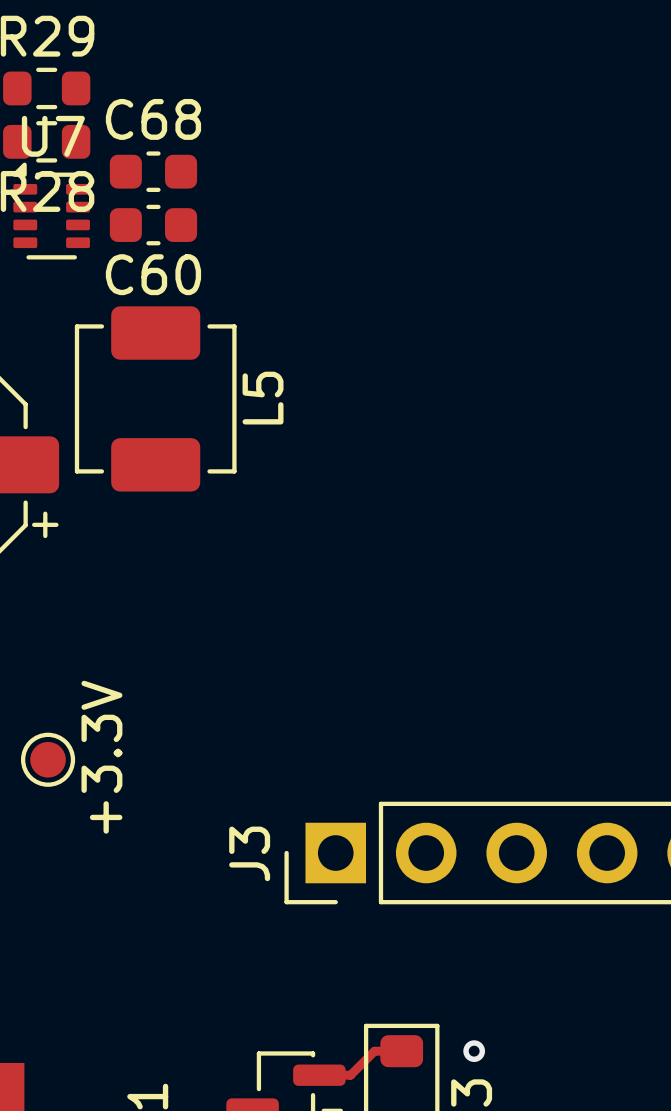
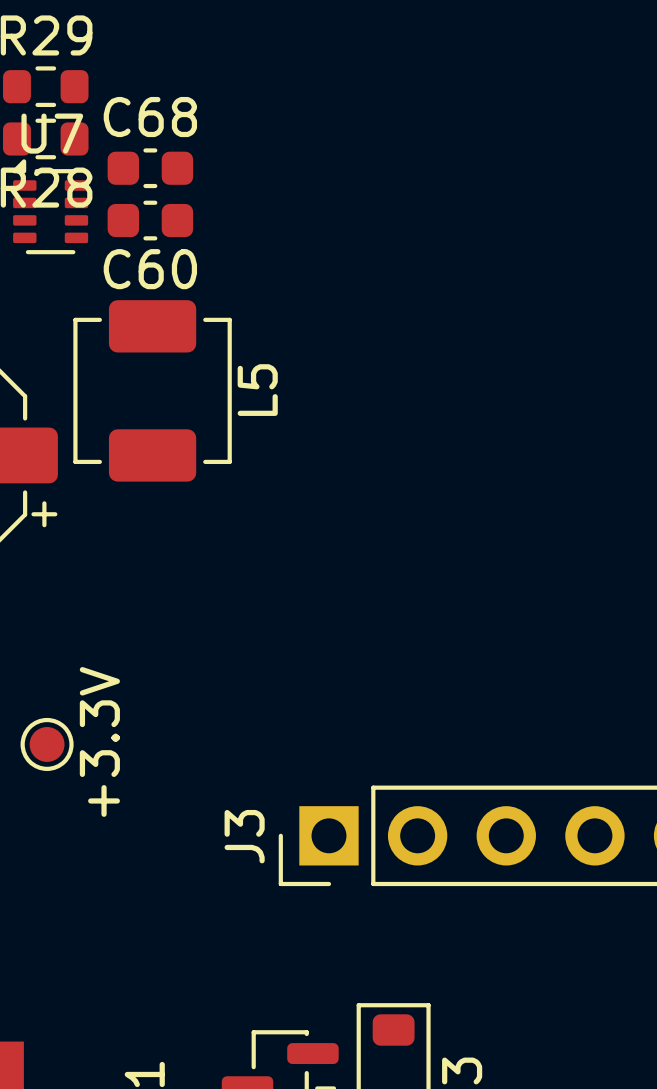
track: (401, 1051) (374, 1051) (350, 1075) (319, 1075) -> none
via: (474, 1051) -> none

